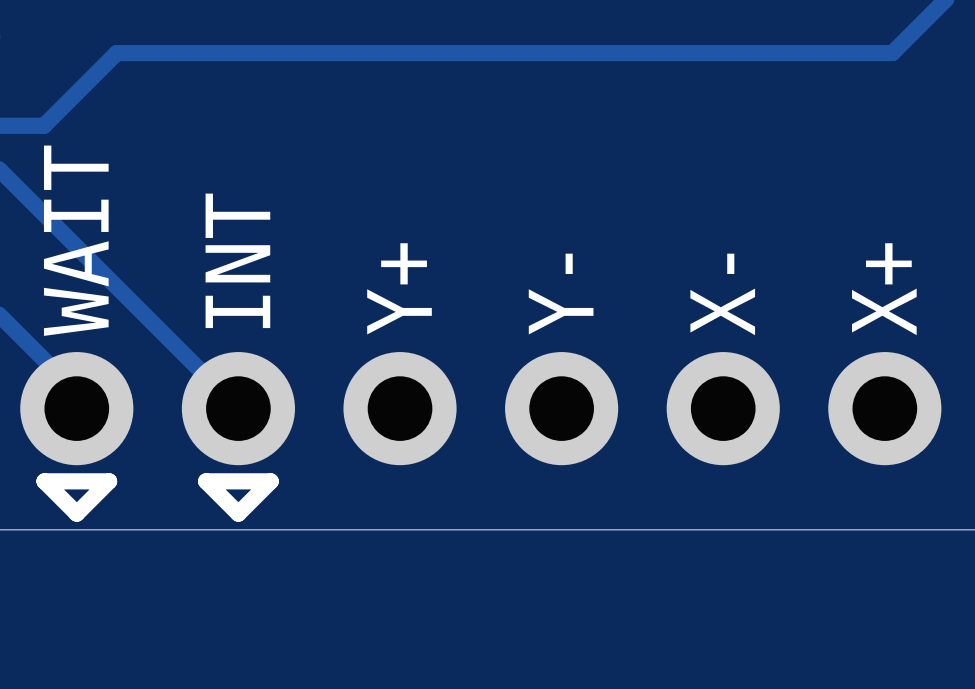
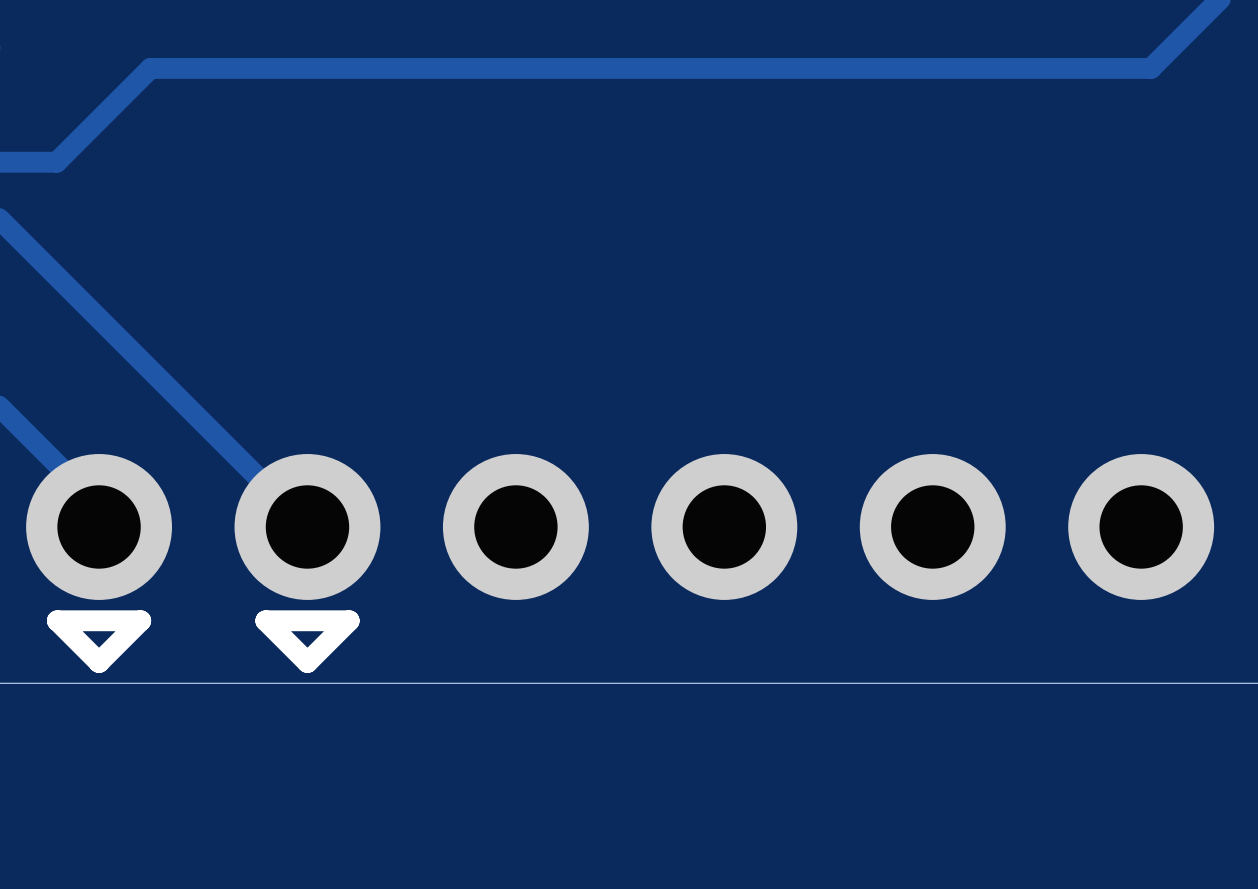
text: WAIT (76, 240) -> none
text: INT (237, 260) -> none
text: Y+ (399, 288) -> none
text: X+ (884, 289) -> none
text: Y- (561, 294) -> none
text: X- (722, 294) -> none

